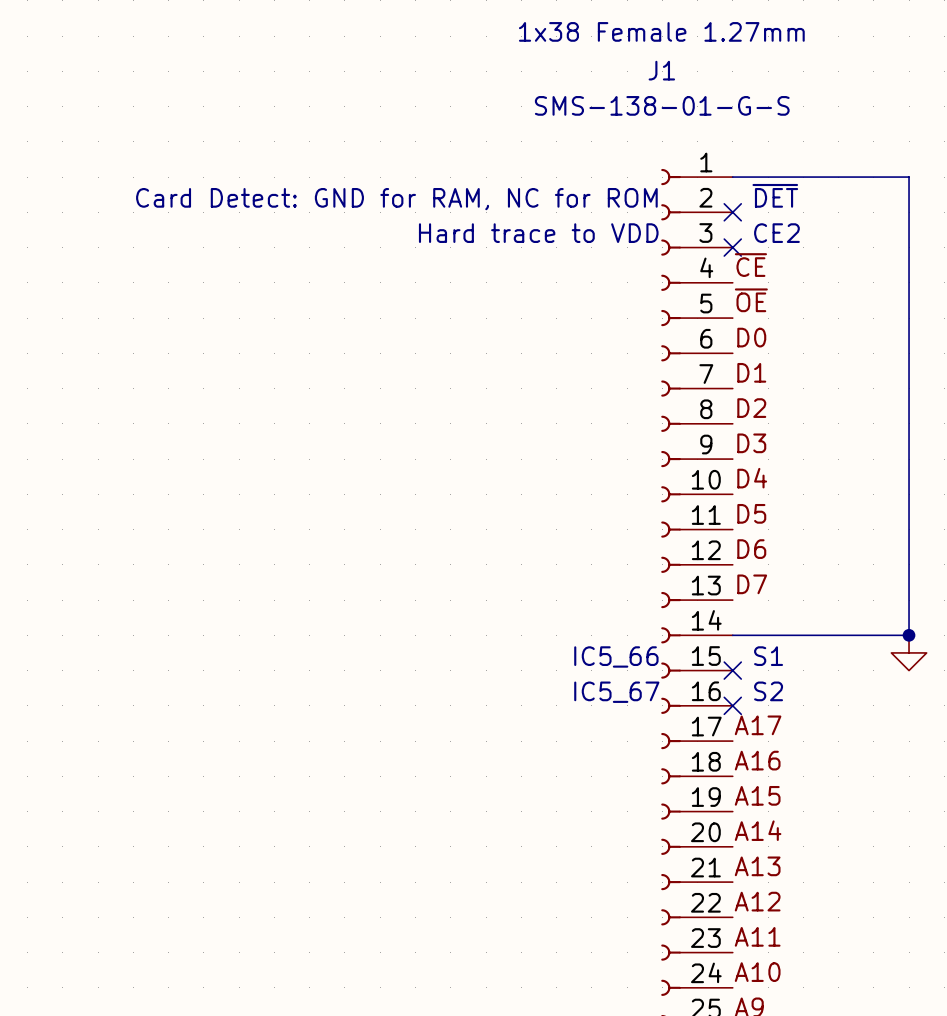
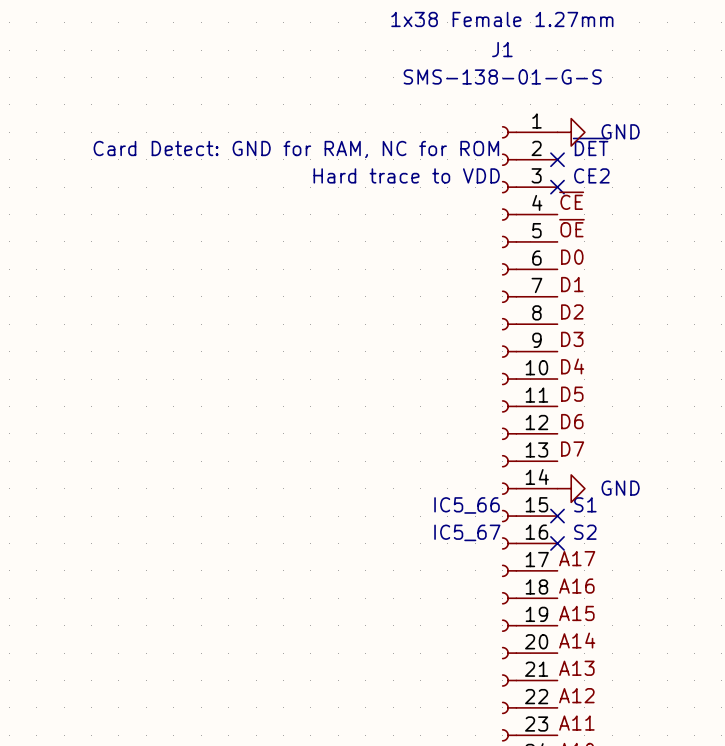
wire: (732, 177) (909, 177) (909, 635) (732, 635) -> none
power symbol: none -> GND (571, 132)
power symbol: none -> GND (571, 488)
junction: (909, 635) -> none
power symbol: (909, 652) -> none

